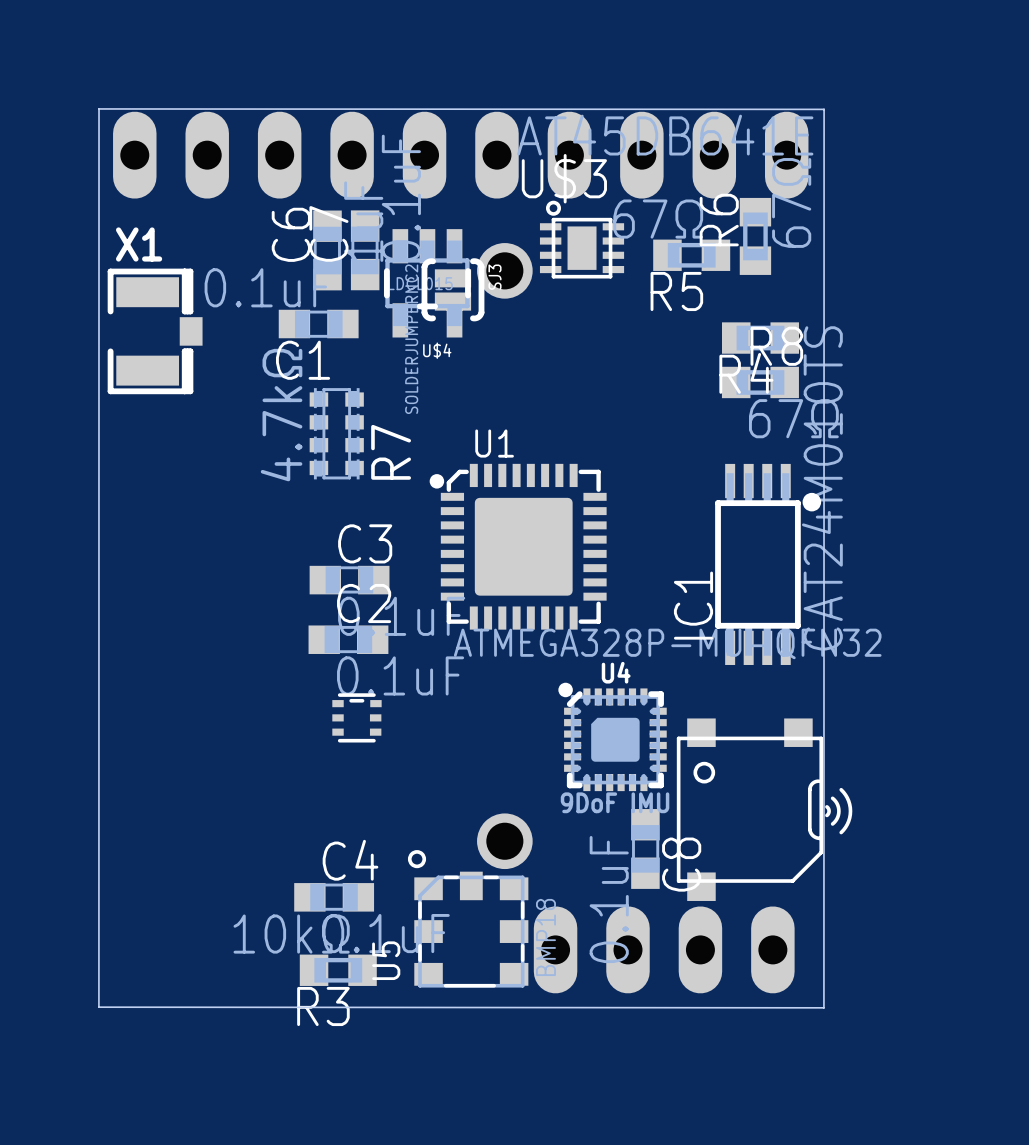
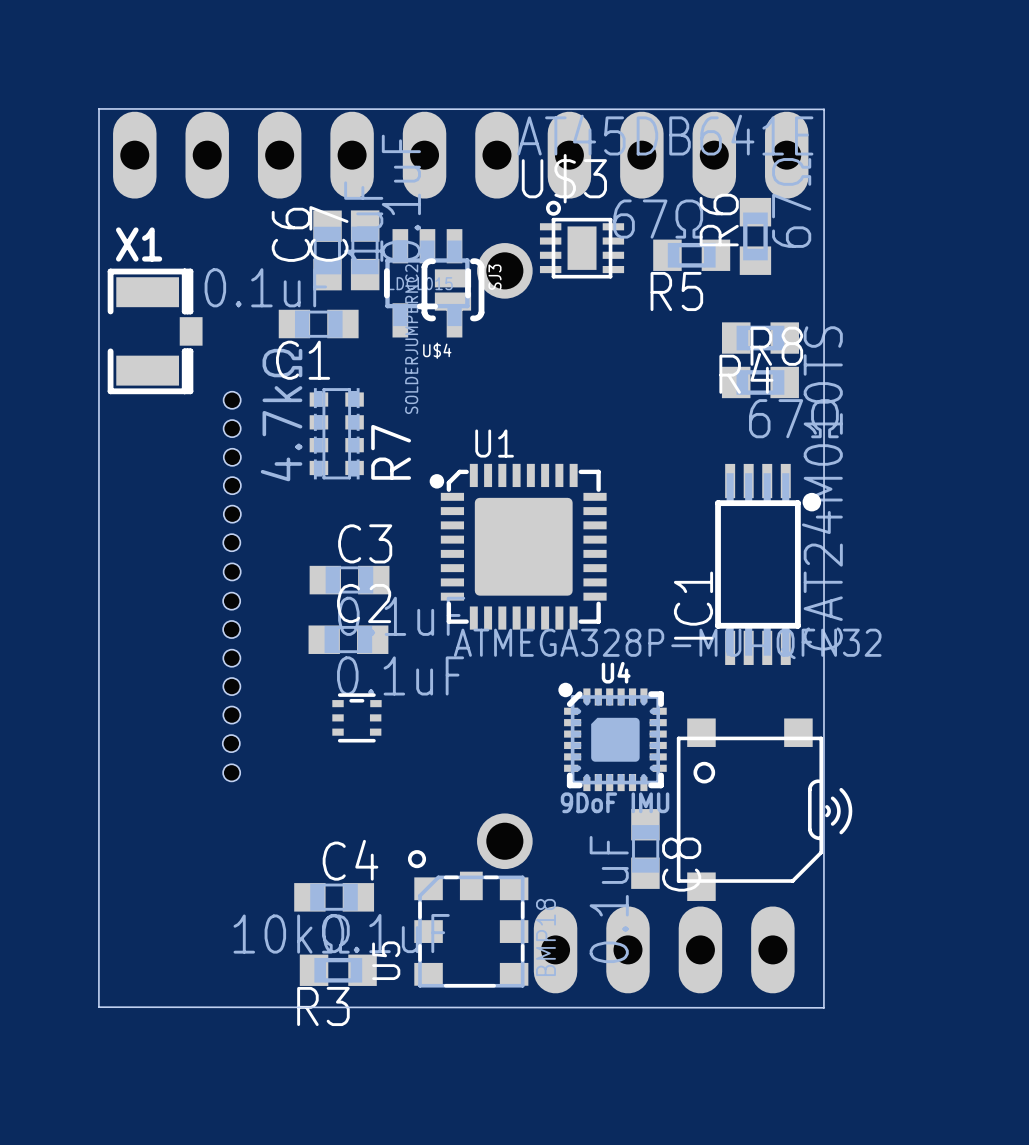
hole: none -> (232, 400)
hole: none -> (232, 428)
hole: none -> (232, 457)
hole: none -> (232, 485)
hole: none -> (232, 514)
hole: none -> (231, 542)
hole: none -> (232, 571)
hole: none -> (231, 601)
hole: none -> (231, 629)
hole: none -> (231, 658)
hole: none -> (231, 686)
hole: none -> (231, 715)
hole: none -> (231, 743)
hole: none -> (231, 772)

